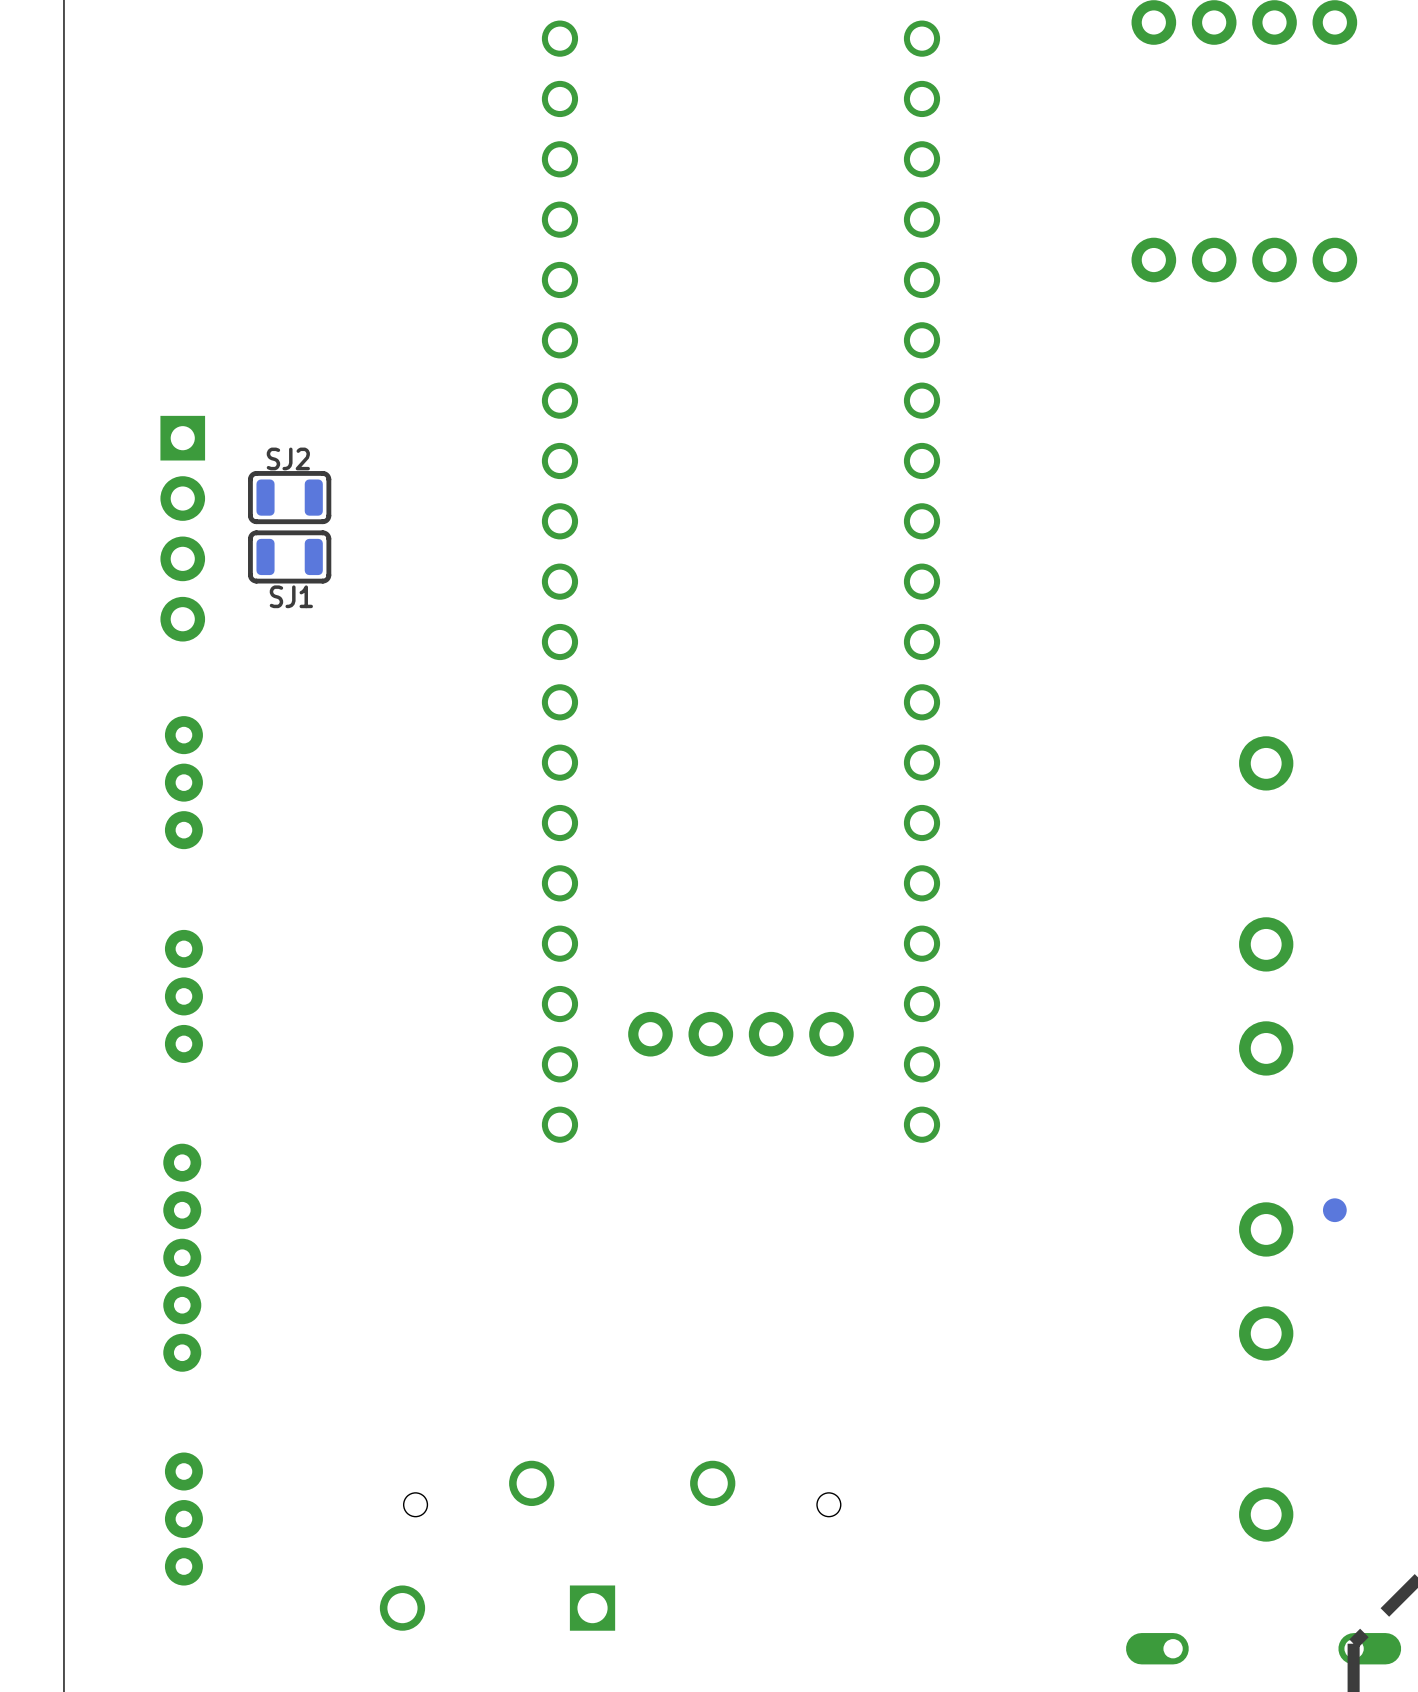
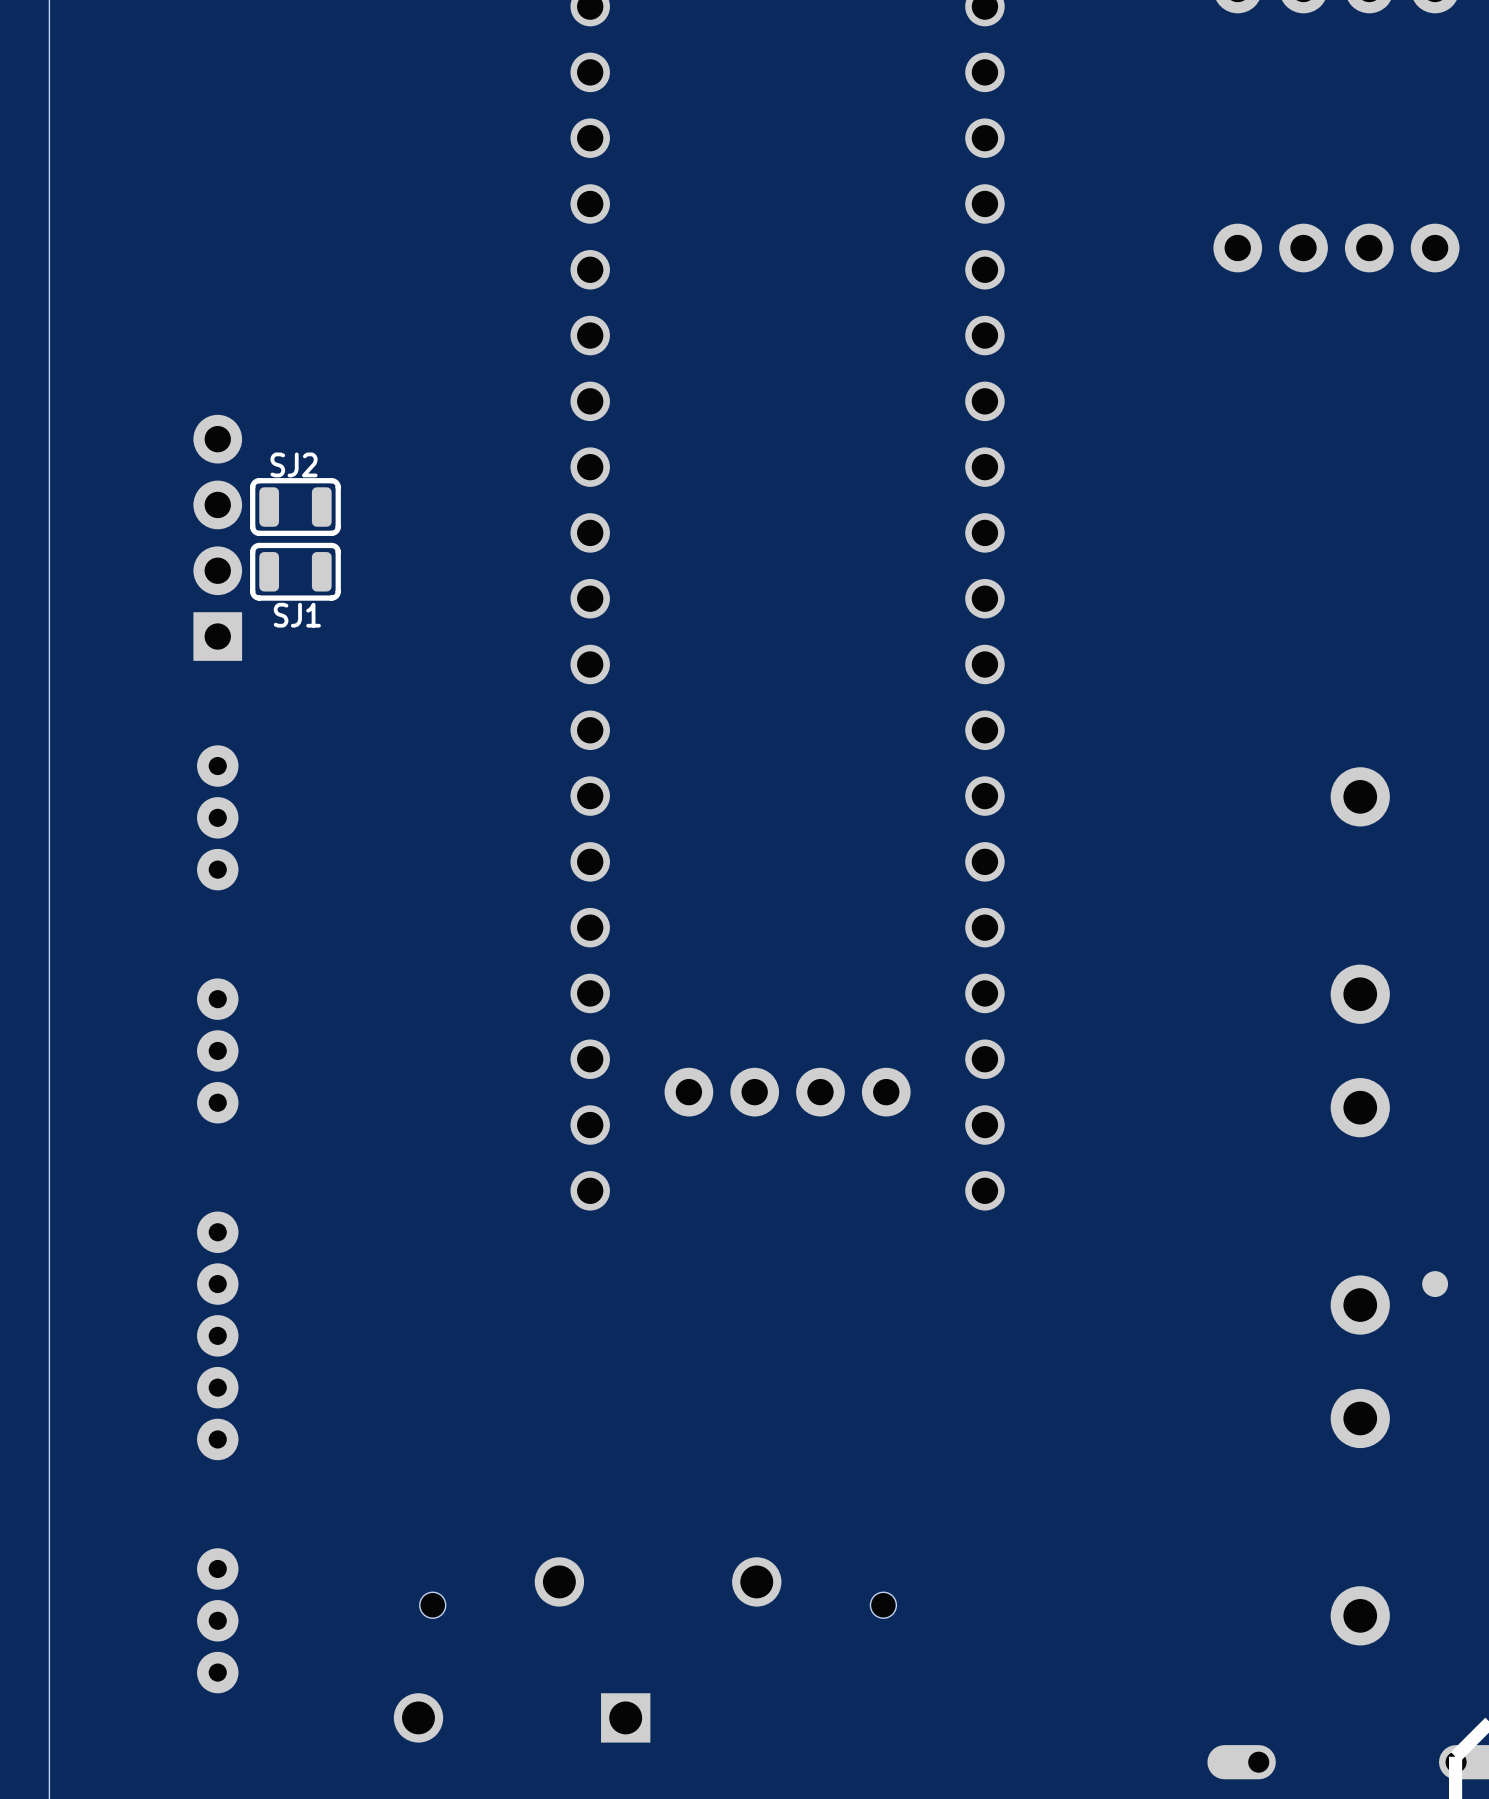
part rotation: 0° (182, 528) -> 180° (217, 537)
part position: (183, 782) -> (217, 817)
part position: (183, 996) -> (217, 1050)
part position: (182, 1257) -> (217, 1335)
part position: (183, 1519) -> (217, 1620)

